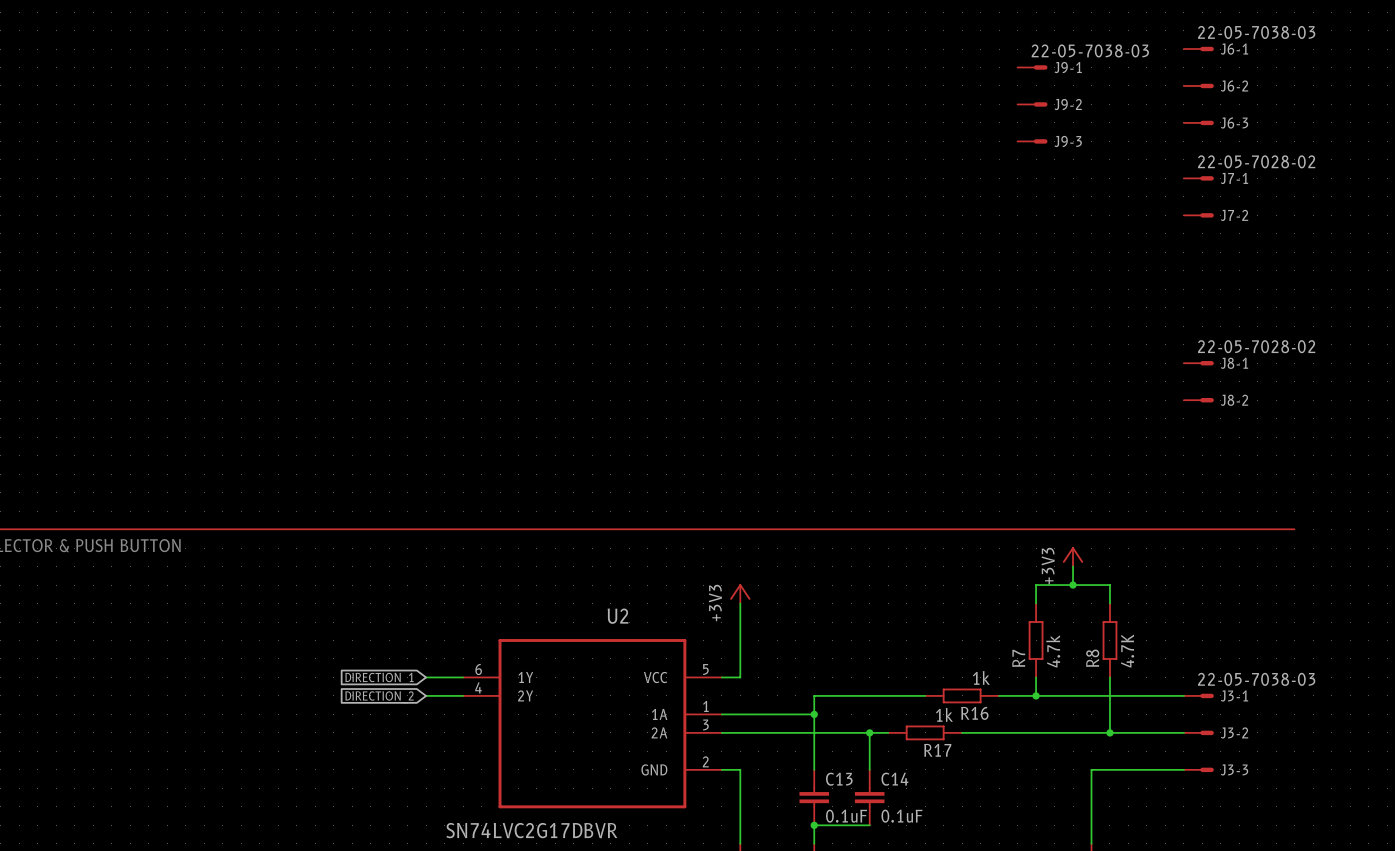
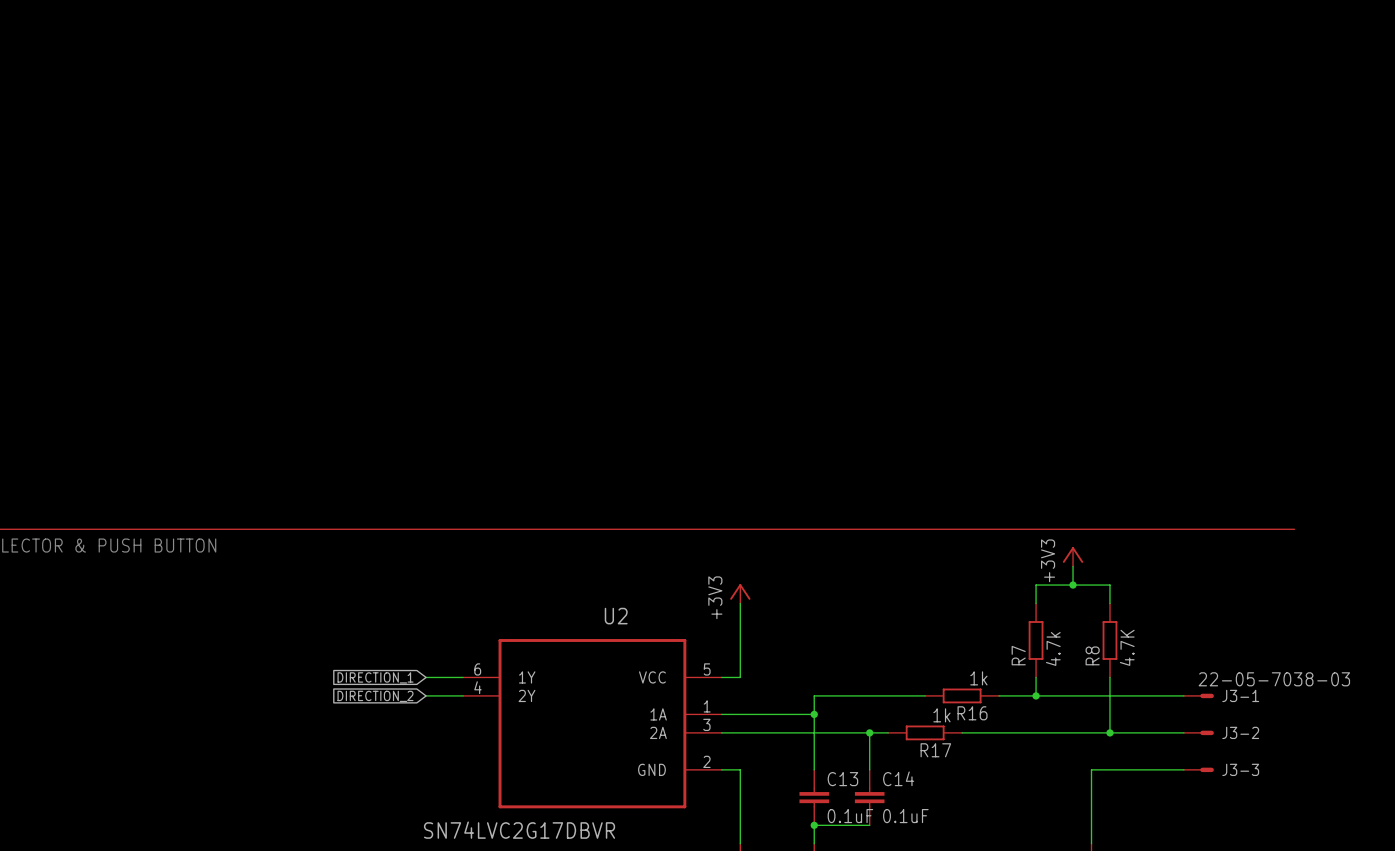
J6-1: 22-05-7038-03 (1198, 49) -> none
J9-1: 22-05-7038-03 (1032, 67) -> none
J6-2: (1198, 85) -> none
J9-2: (1032, 104) -> none
J6-3: (1198, 122) -> none
J9-3: (1032, 141) -> none
J7-1: 22-05-7028-02 (1198, 178) -> none
J7-2: (1198, 215) -> none
J8-1: 22-05-7028-02 (1198, 363) -> none
J8-2: (1198, 400) -> none

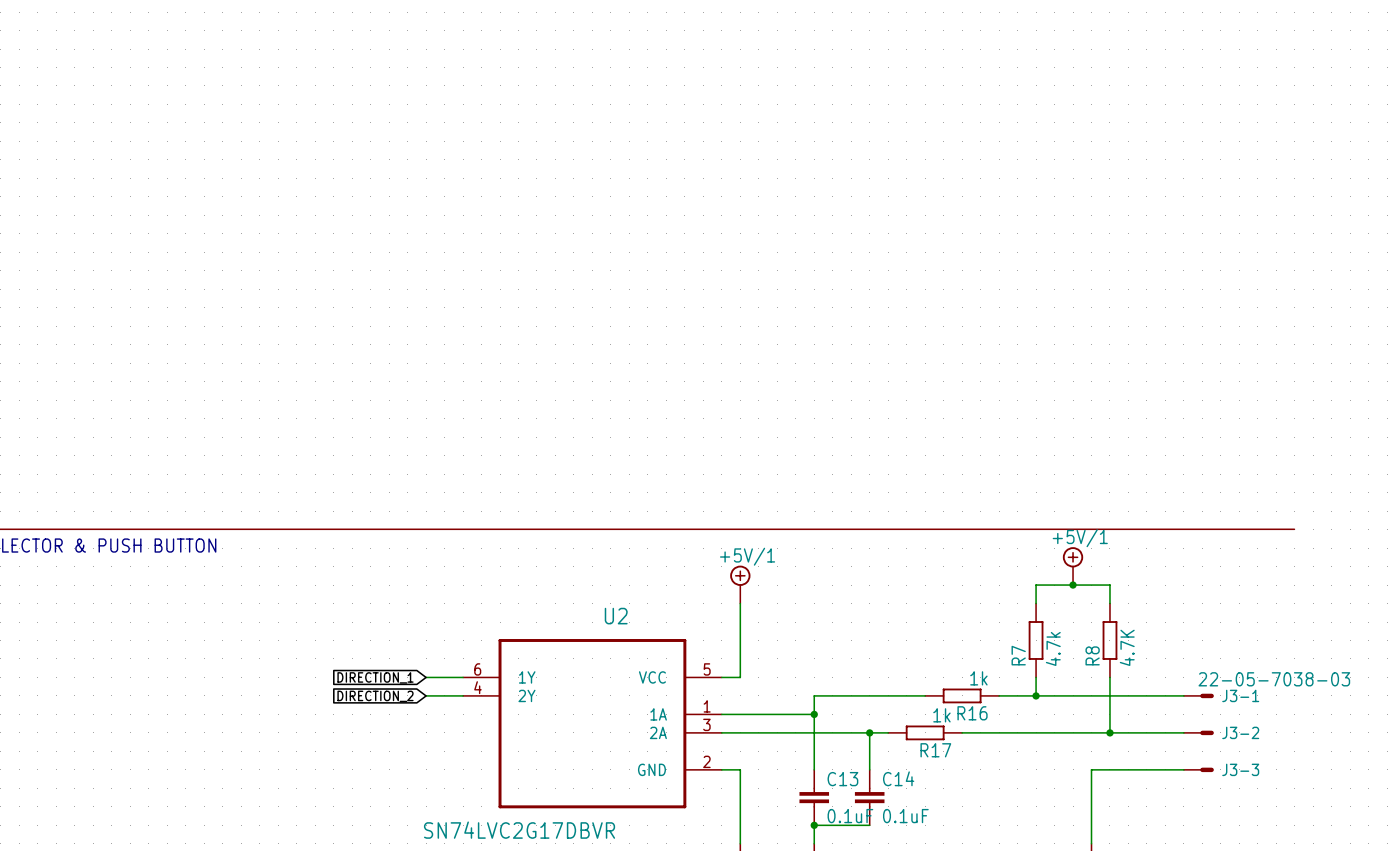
power symbol: +3V3 (1073, 556) -> none
power symbol: none -> +5V/1 (1073, 566)
power symbol: none -> +5V/1 (740, 584)
power symbol: +3V3 (740, 593) -> none

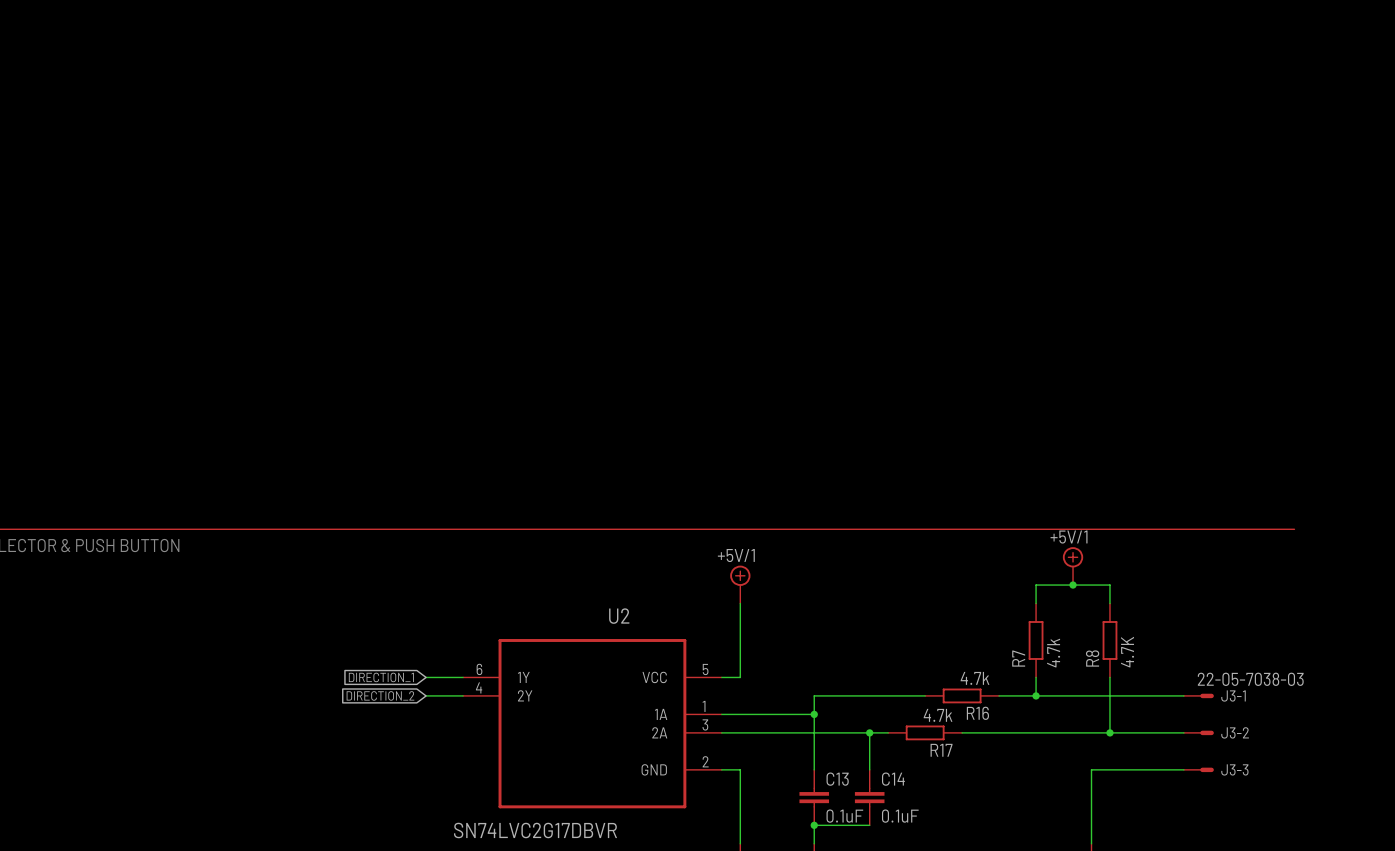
R16 value: 1k (978, 678) -> 4.7k (975, 678)
R17 value: 1k (941, 715) -> 4.7k (938, 715)

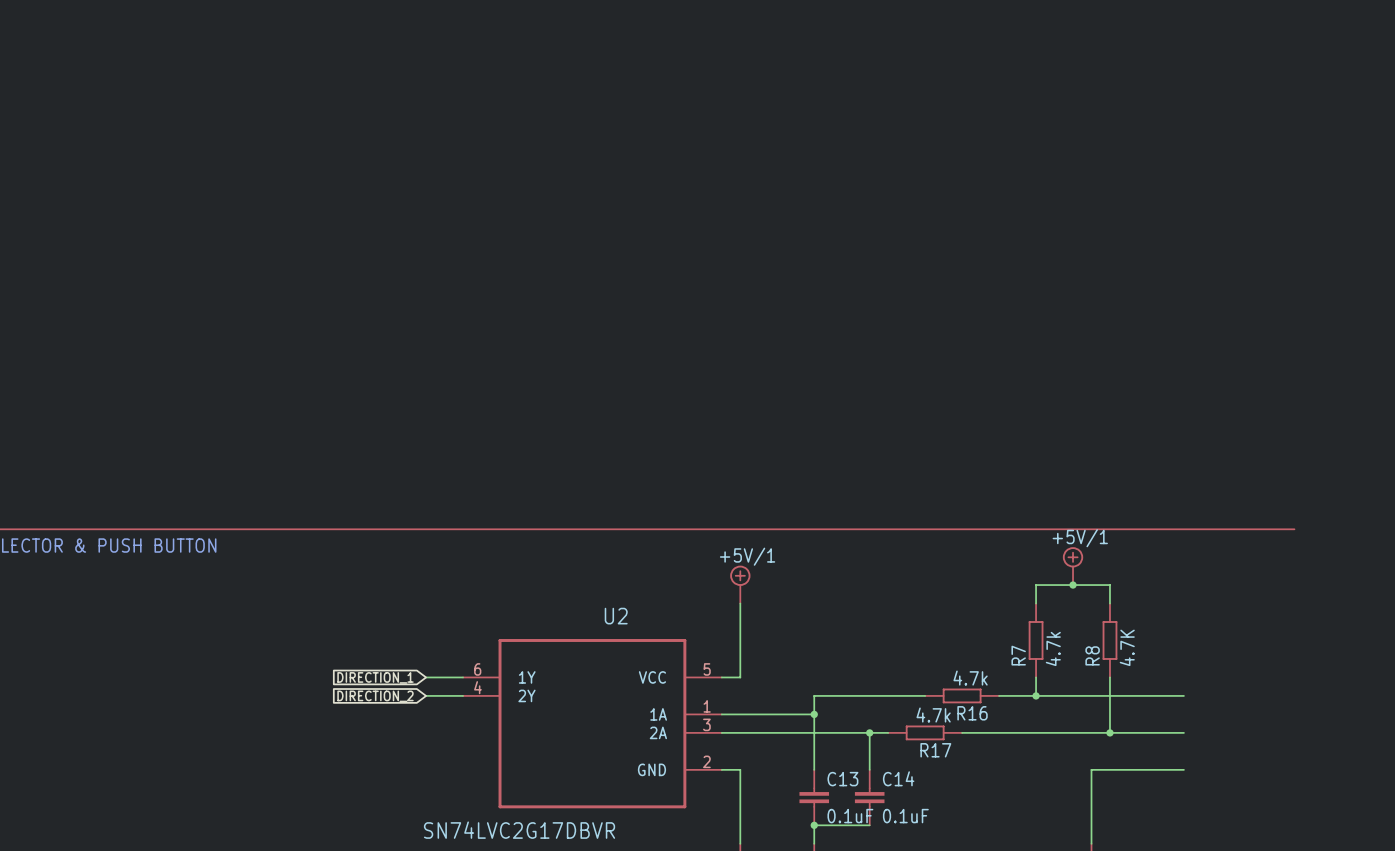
J3-1: 22-05-7038-03 (1198, 695) -> none
J3-2: (1198, 732) -> none
J3-3: (1198, 769) -> none

